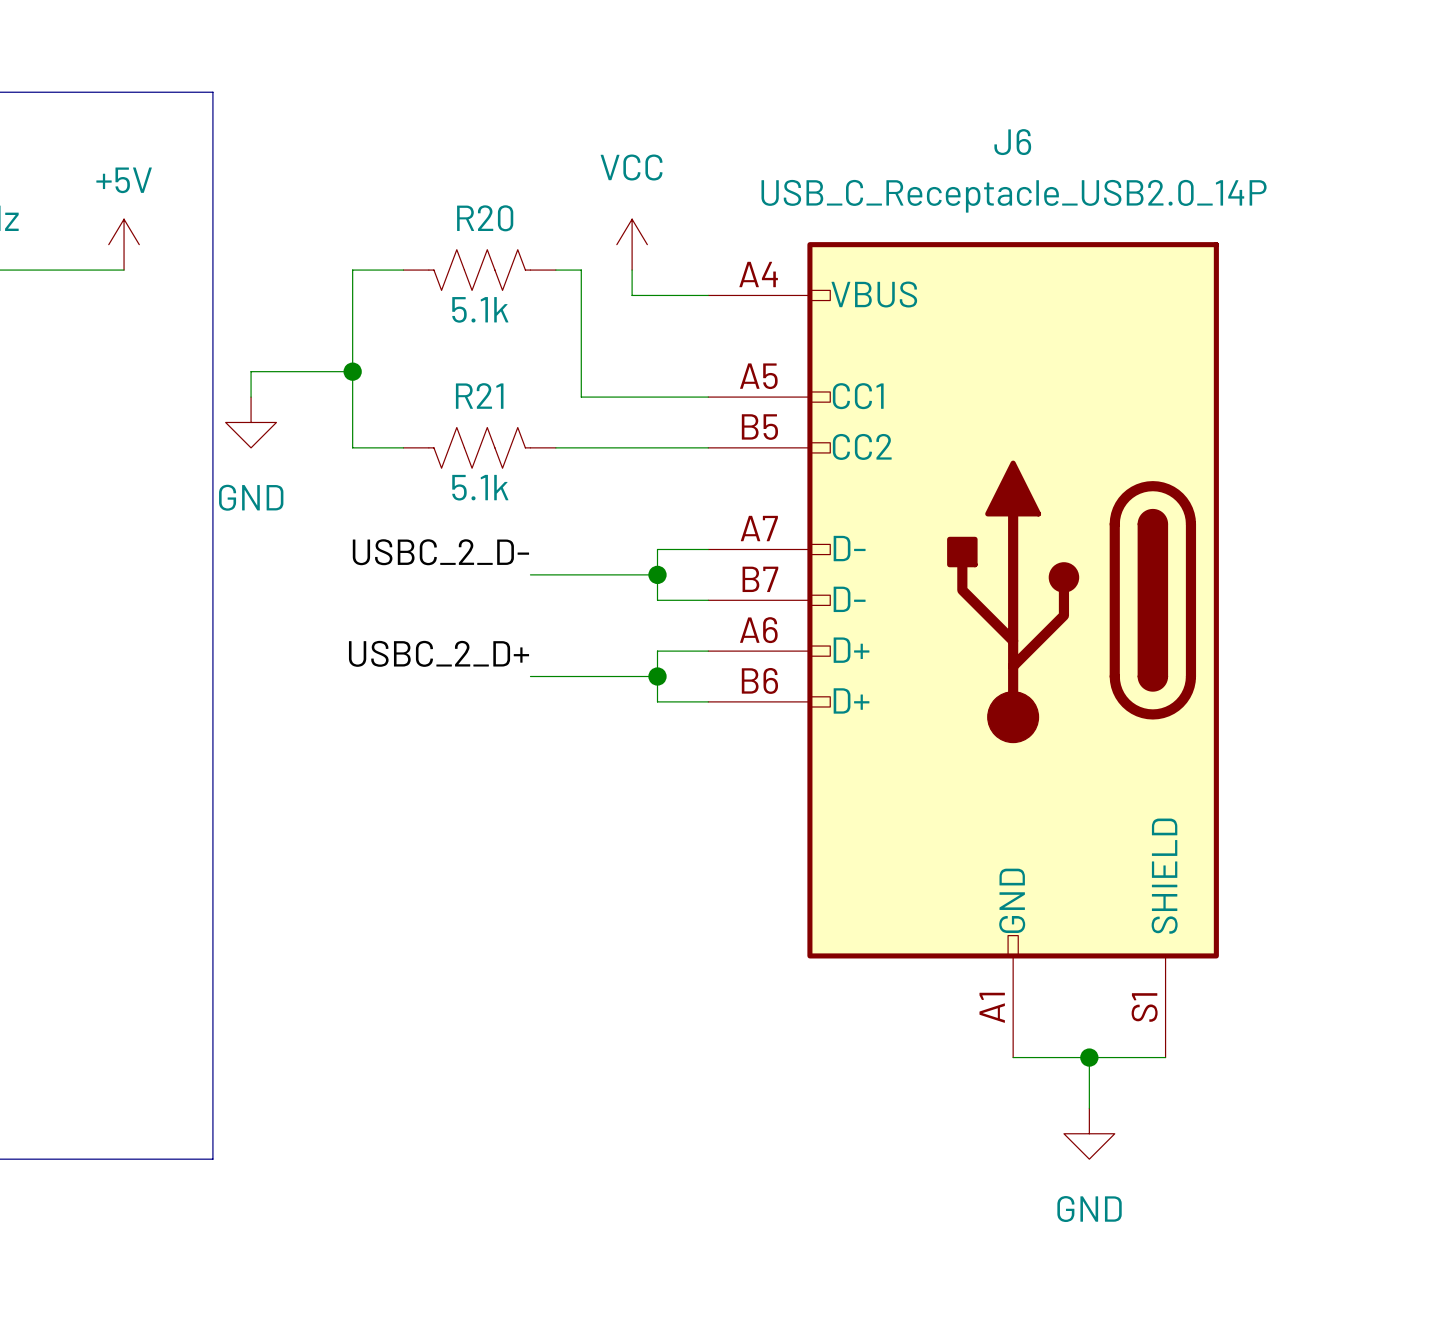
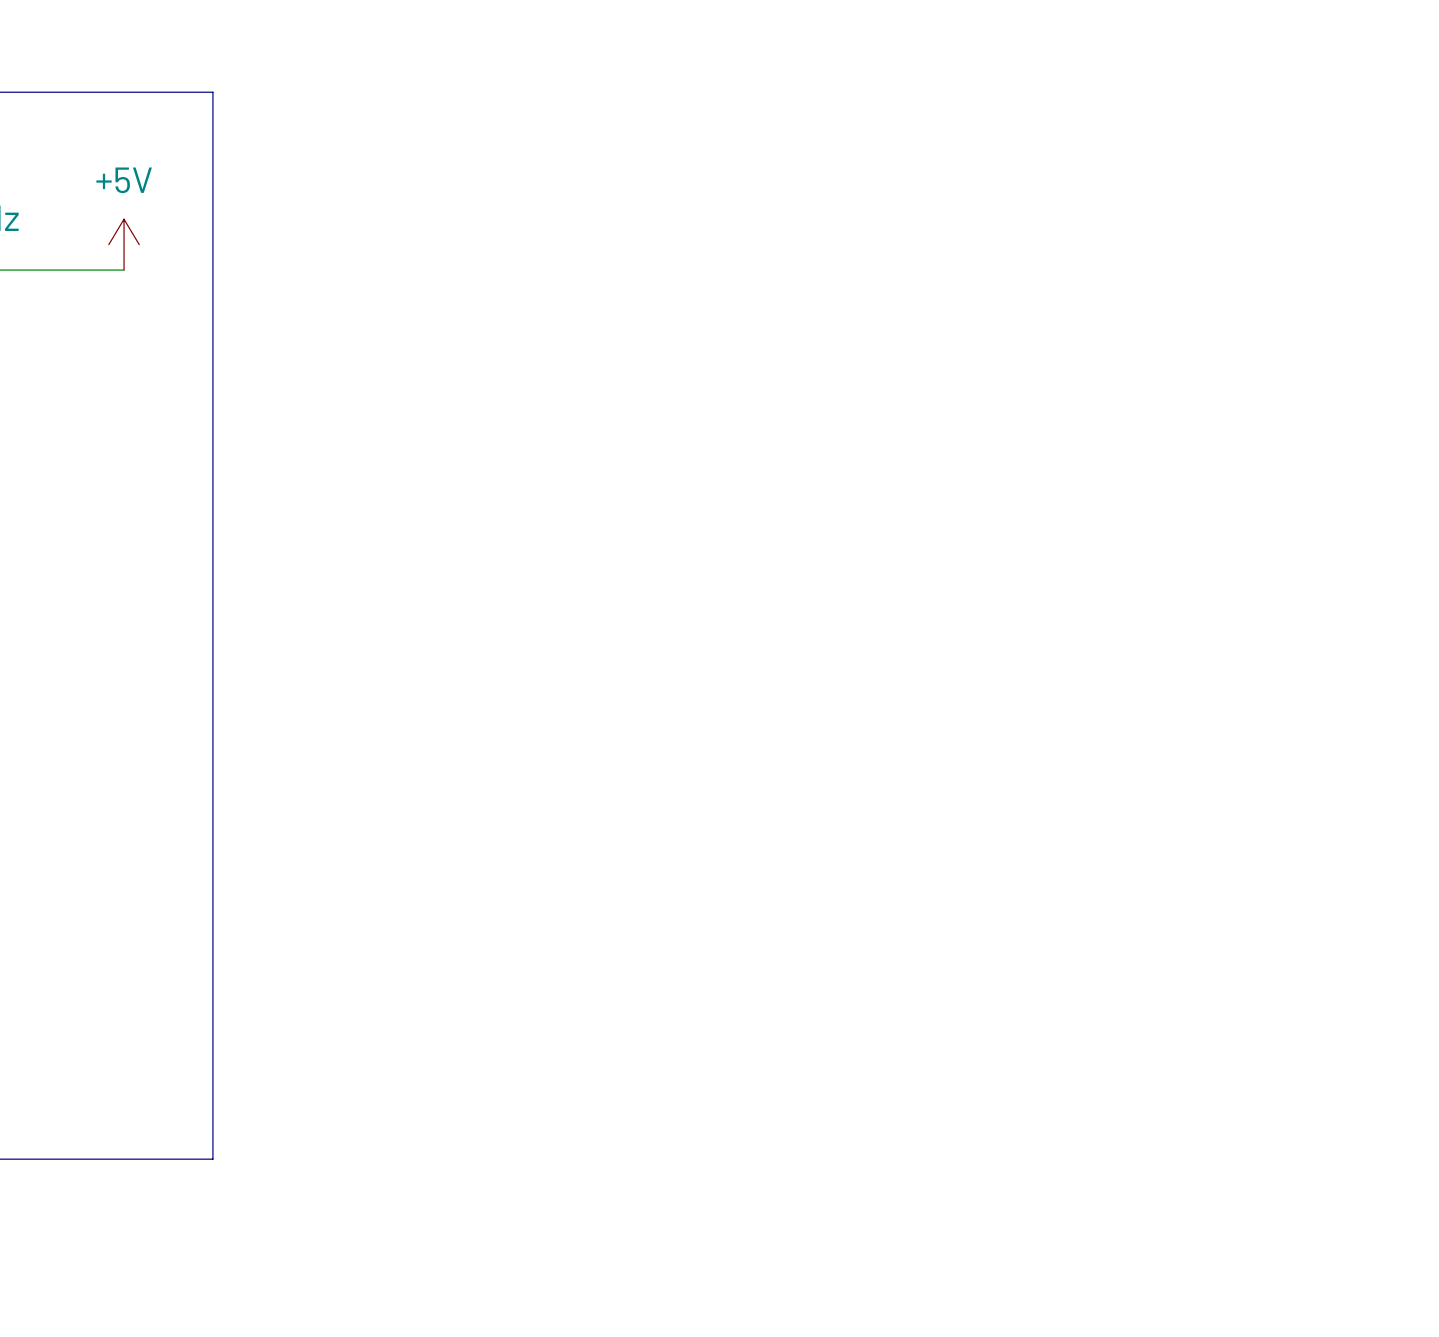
power symbol: VCC (632, 244) -> none
wire: (403, 270) (352, 270) (352, 447) (403, 447) -> none
R20: 5.1k (479, 270) -> none
wire: (555, 270) (581, 270) (581, 397) (708, 397) -> none
wire: (632, 270) (632, 295) (708, 295) -> none
wire: (352, 371) (251, 371) (251, 397) -> none
junction: (352, 371) -> none
power symbol: GND (251, 422) -> none
R21: 5.1k (479, 447) -> none
wire: (555, 447) (708, 447) -> none
wire: (708, 549) (657, 549) (657, 600) (708, 600) -> none
label: USBC_2_D- (440, 552) -> none
wire: (530, 574) (657, 574) -> none
junction: (657, 574) -> none
J6: USB_C_Receptacle_USB2.0_14P (963, 649) -> none
wire: (708, 651) (657, 651) (657, 701) (708, 701) -> none
label: USBC_2_D+ (439, 653) -> none
wire: (530, 676) (657, 676) -> none
junction: (657, 676) -> none
wire: (1013, 1057) (1165, 1057) -> none
wire: (1089, 1057) (1089, 1108) -> none
junction: (1089, 1057) -> none
power symbol: GND (1089, 1133) -> none

